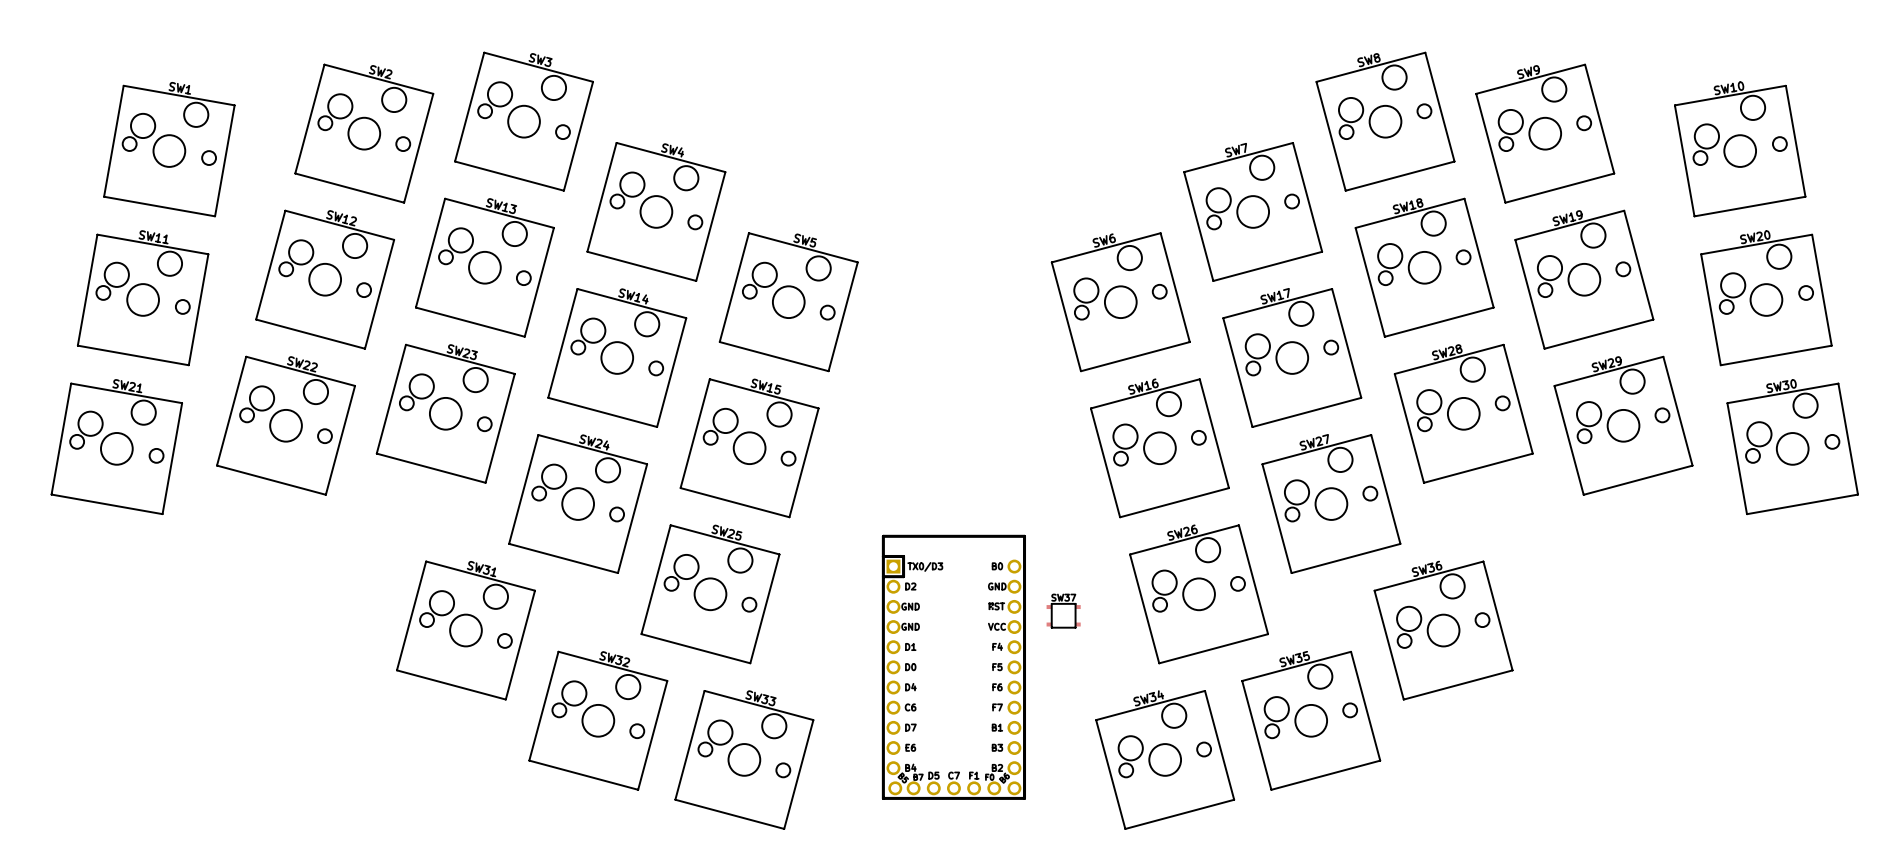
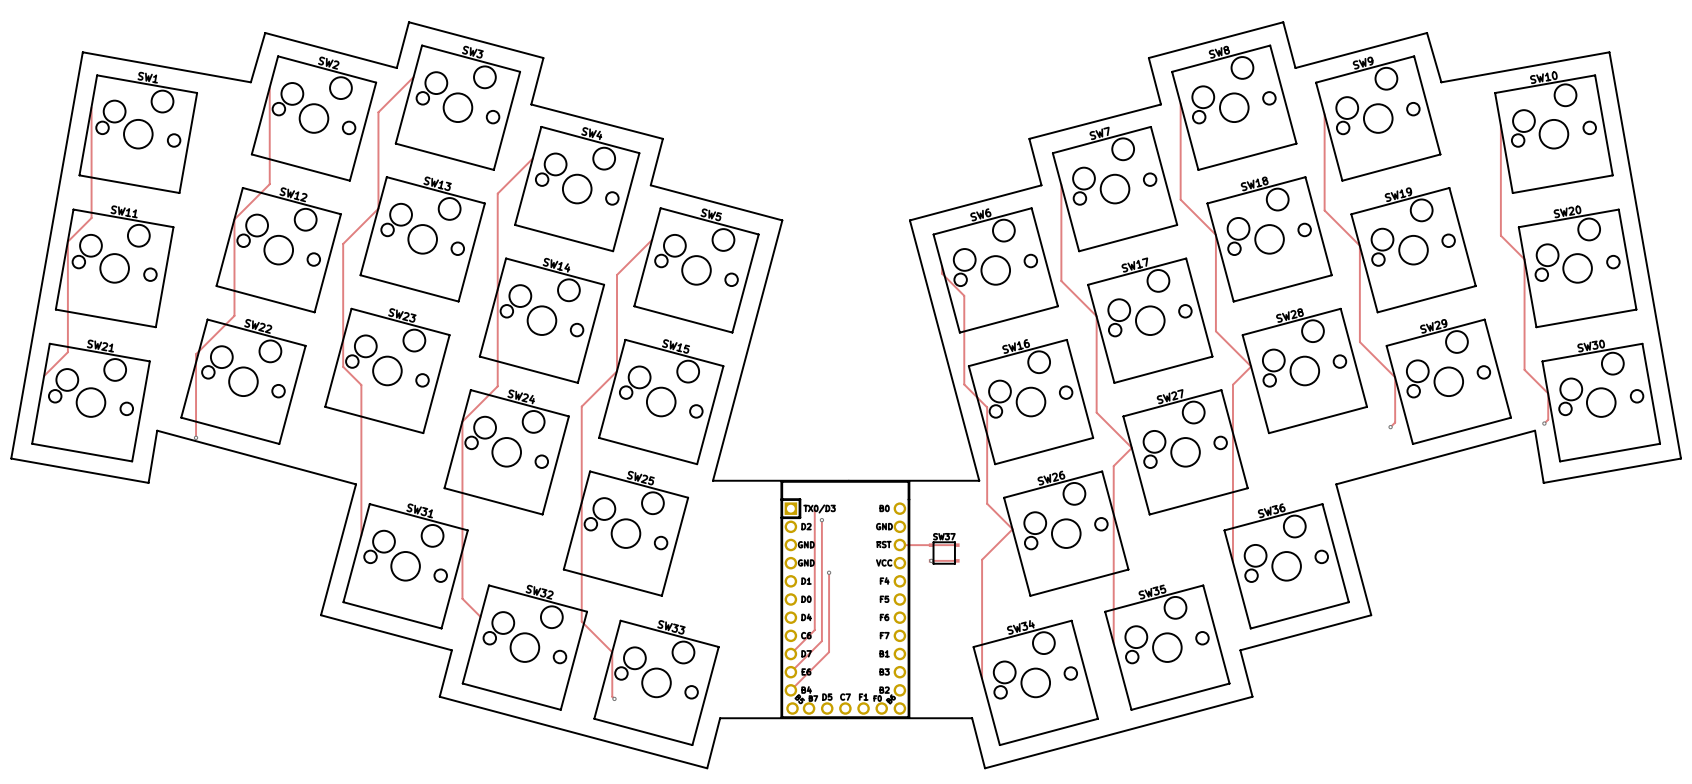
board edge: none -> (408, 22) (543, 58) (531, 104) (662, 138) (650, 185) (782, 220) (712, 480) (979, 480) (909, 220) (1041, 185) (1029, 138) (1160, 104) (1148, 58) (1283, 22) (1295, 68) (1427, 32) (1441, 82) (1609, 52) (1681, 458) (1543, 482) (1535, 430) (1336, 484) (1371, 615) (1240, 650) (1252, 696) (985, 768) (972, 718) (720, 718) (707, 768) (439, 696) (451, 650) (321, 615) (356, 484) (157, 430) (148, 482) (11, 458) (82, 52) (250, 82) (265, 32) (396, 68) (408, 22)
track: none -> (413, 77) (378, 112) (378, 208) (343, 243) (343, 366) (361, 385) (361, 535)
track: none -> (269, 87) (269, 184) (234, 219) (234, 315) (196, 354) (196, 437)
track: none -> (1180, 103) (1180, 199) (1215, 234) (1215, 331) (1251, 366) (1232, 384) (1232, 561)
track: none -> (91, 107) (91, 218) (67, 241) (67, 352) (44, 375)
track: none -> (1324, 114) (1324, 210) (1359, 245) (1359, 342) (1395, 377) (1395, 422) (1390, 427)
track: none -> (1500, 125) (1500, 235) (1524, 259) (1524, 369) (1548, 393) (1548, 419) (1544, 423)
track: none -> (532, 158) (497, 193) (497, 386) (462, 421) (462, 598) (480, 616)
track: none -> (1061, 184) (1061, 281) (1096, 316) (1096, 412) (1131, 447) (1113, 466) (1113, 643)
track: none -> (652, 239) (617, 274) (617, 371) (581, 406) (581, 621) (612, 652) (612, 696) (614, 698)
track: none -> (942, 265) (942, 273) (964, 295) (964, 384) (987, 407) (987, 503) (1012, 529) (982, 559) (982, 678)
via: none -> (1544, 423)
via: none -> (1390, 427)
via: none -> (196, 437)
track: none -> (814, 509) (814, 630) (790, 654)
track: none -> (821, 520) (821, 641) (790, 672)
via: none -> (821, 520)
track: none -> (899, 544) (957, 545)
track: none -> (931, 560) (957, 560)
via: none -> (931, 560)
track: none -> (829, 572) (829, 652) (790, 690)
via: none -> (829, 572)
via: none -> (614, 698)

